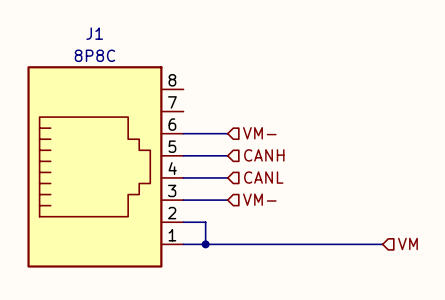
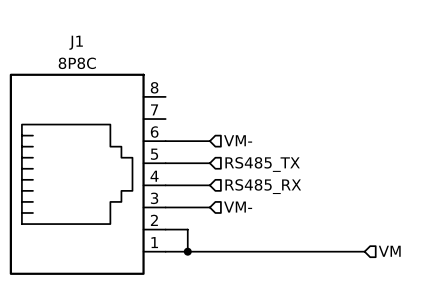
hierarchical label: CANH (264, 155) -> RS485_TX (262, 164)
hierarchical label: CANL (263, 177) -> RS485_RX (263, 186)

